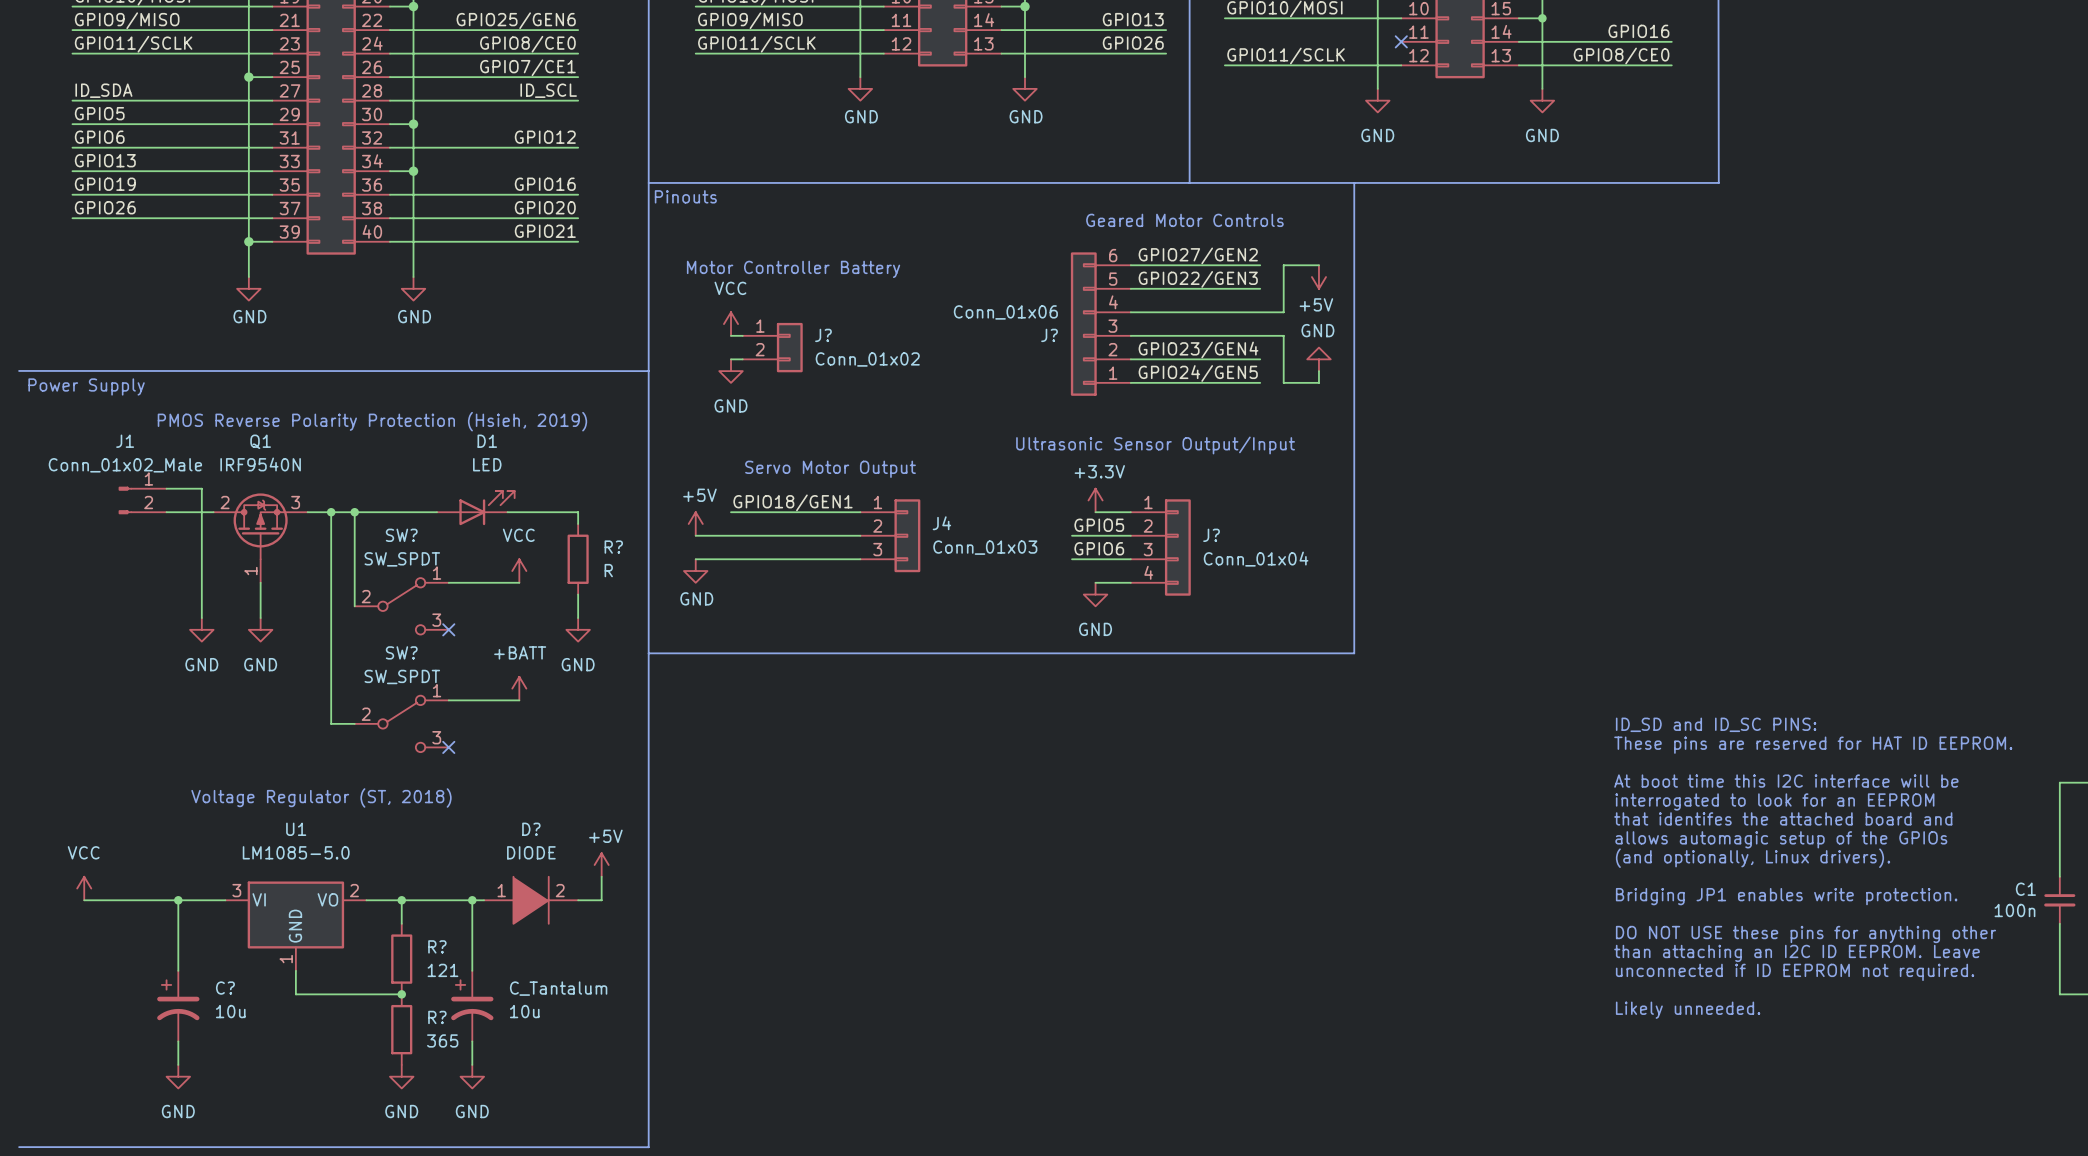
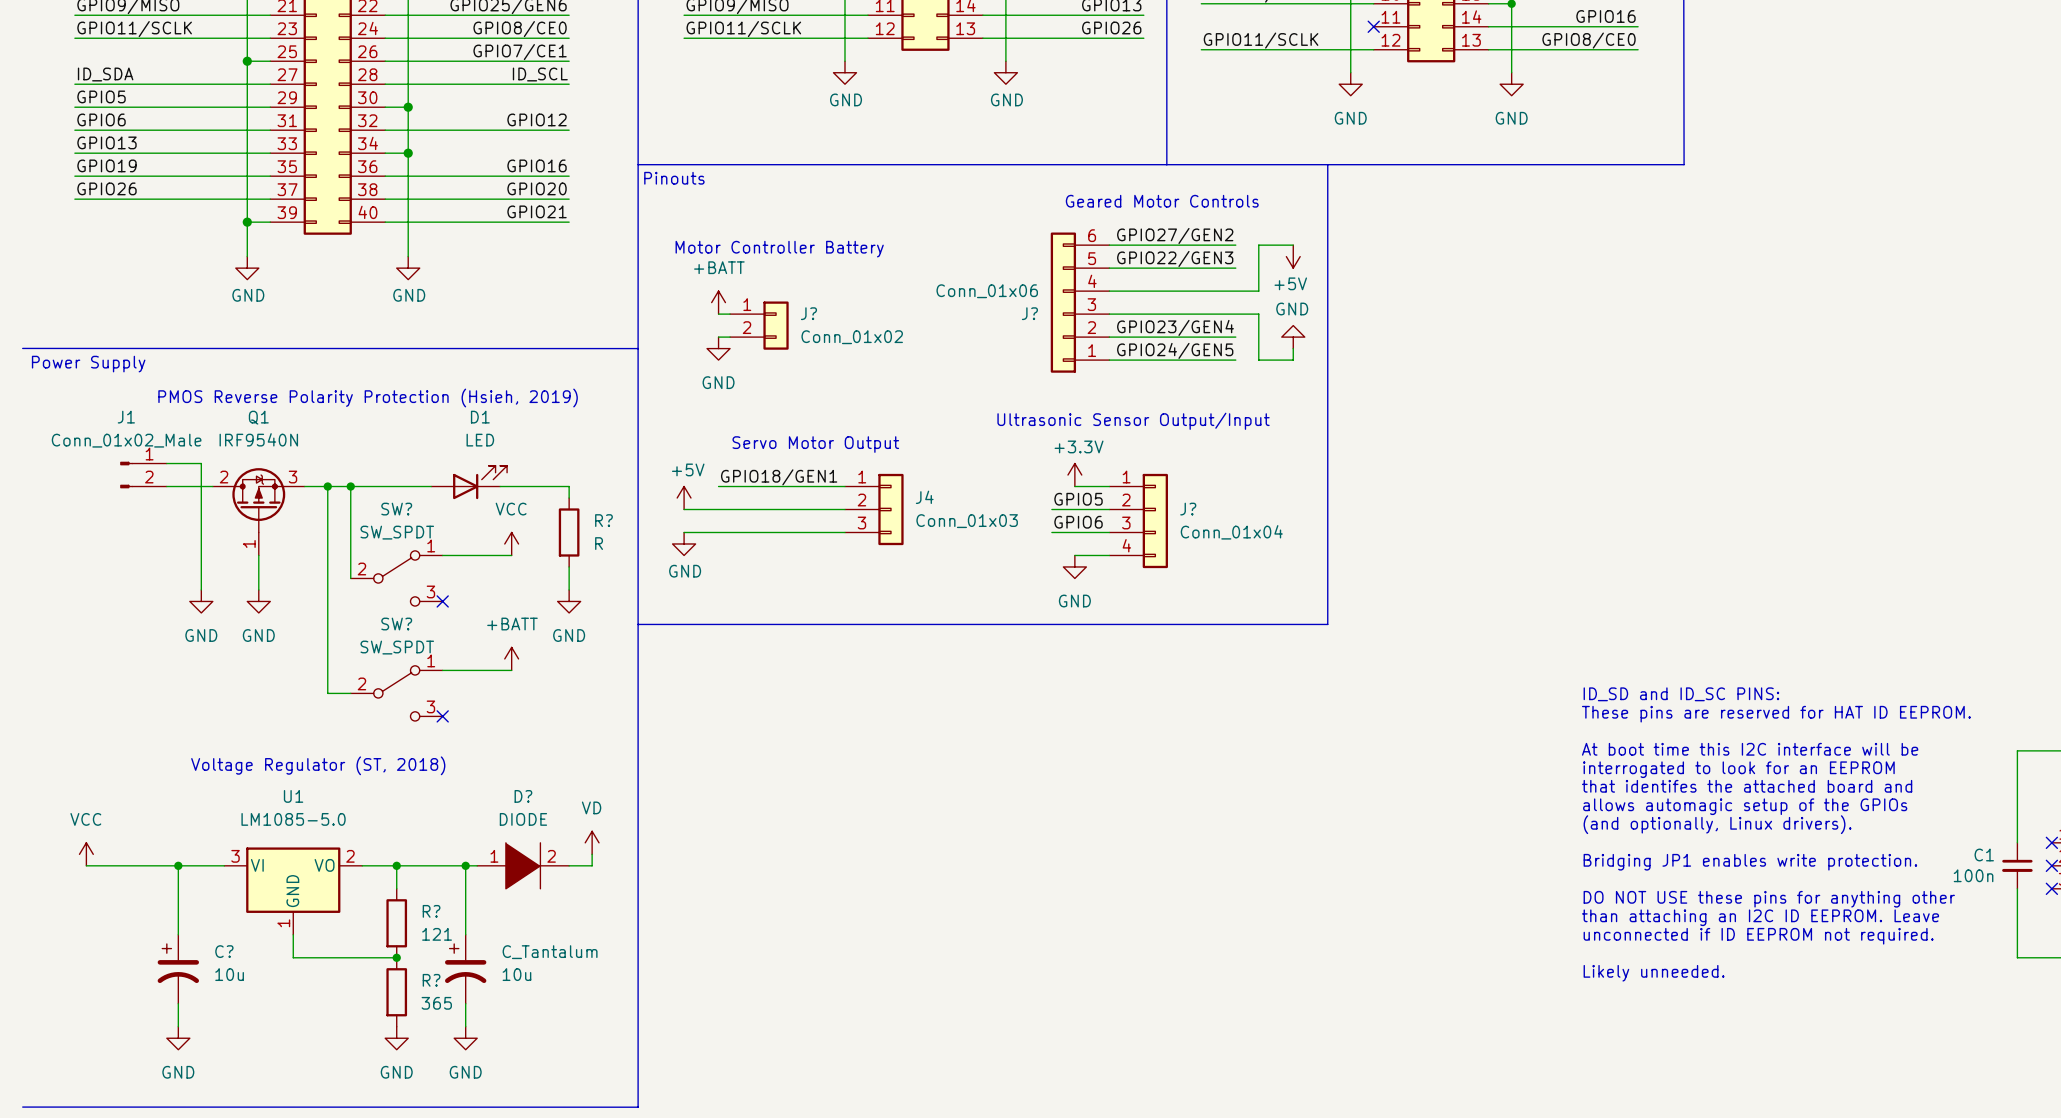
power symbol: VCC (731, 324) -> +BATT (718, 302)
power symbol: +5V (601, 865) -> none
power symbol: none -> VD (592, 842)

